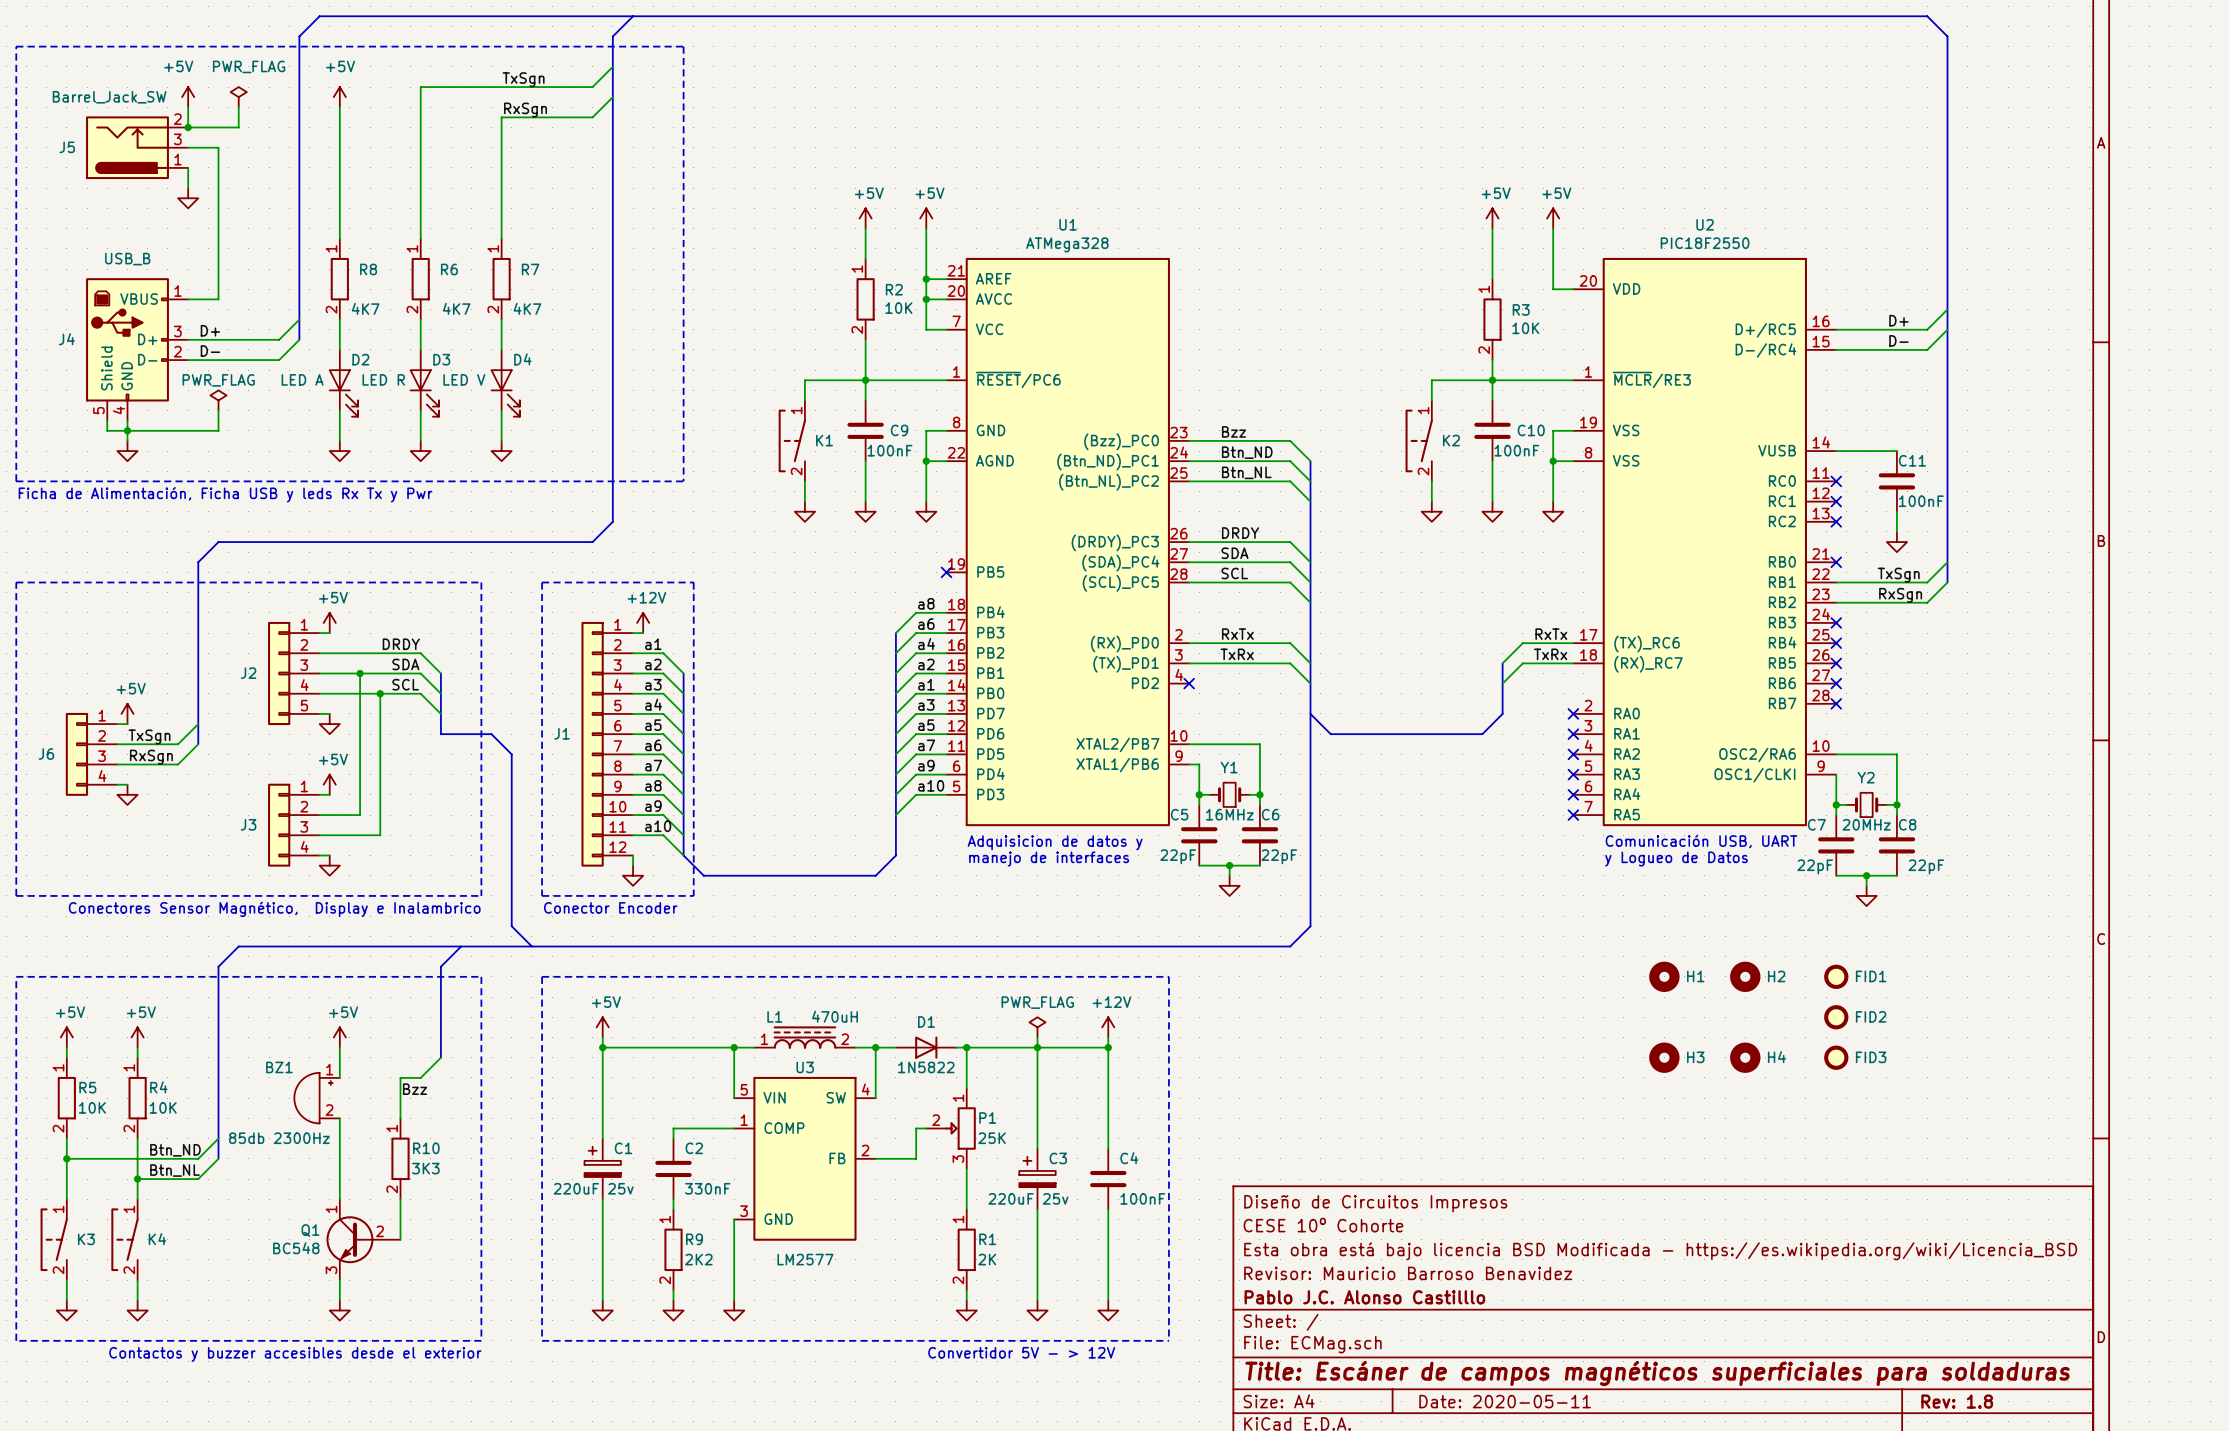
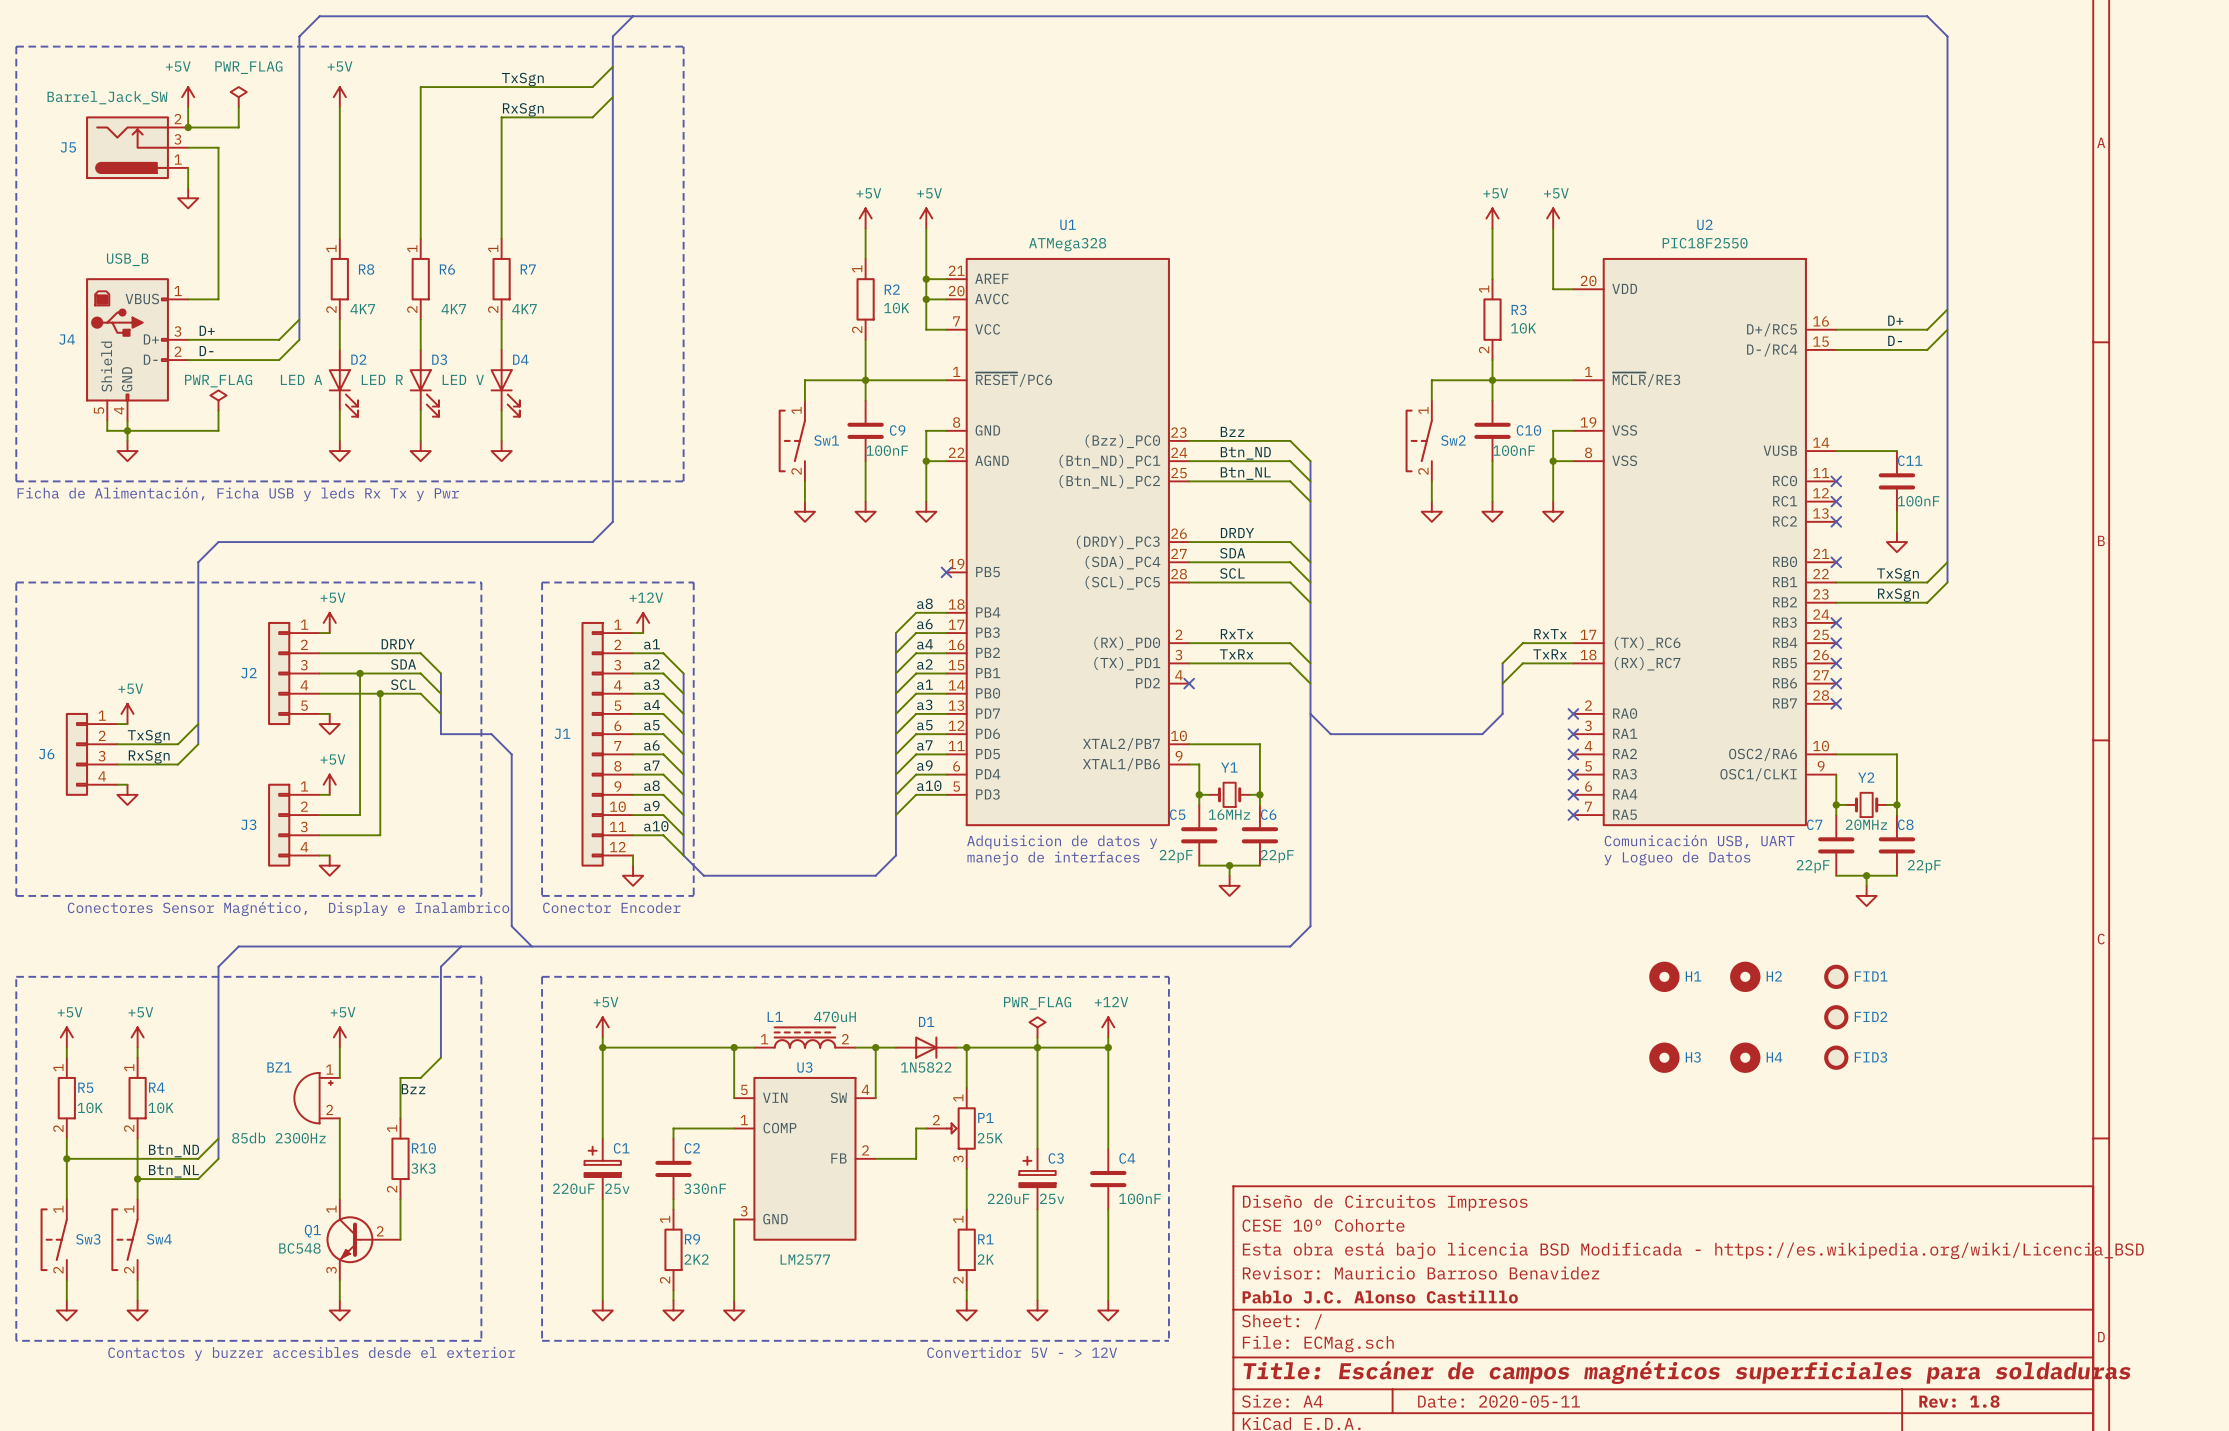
K1 name: K1 (824, 440) -> Sw1 (826, 440)
K2 name: K2 (1451, 440) -> Sw2 (1453, 440)
K3 name: K3 (86, 1239) -> Sw3 (88, 1239)
K4 name: K4 (157, 1239) -> Sw4 (159, 1239)

